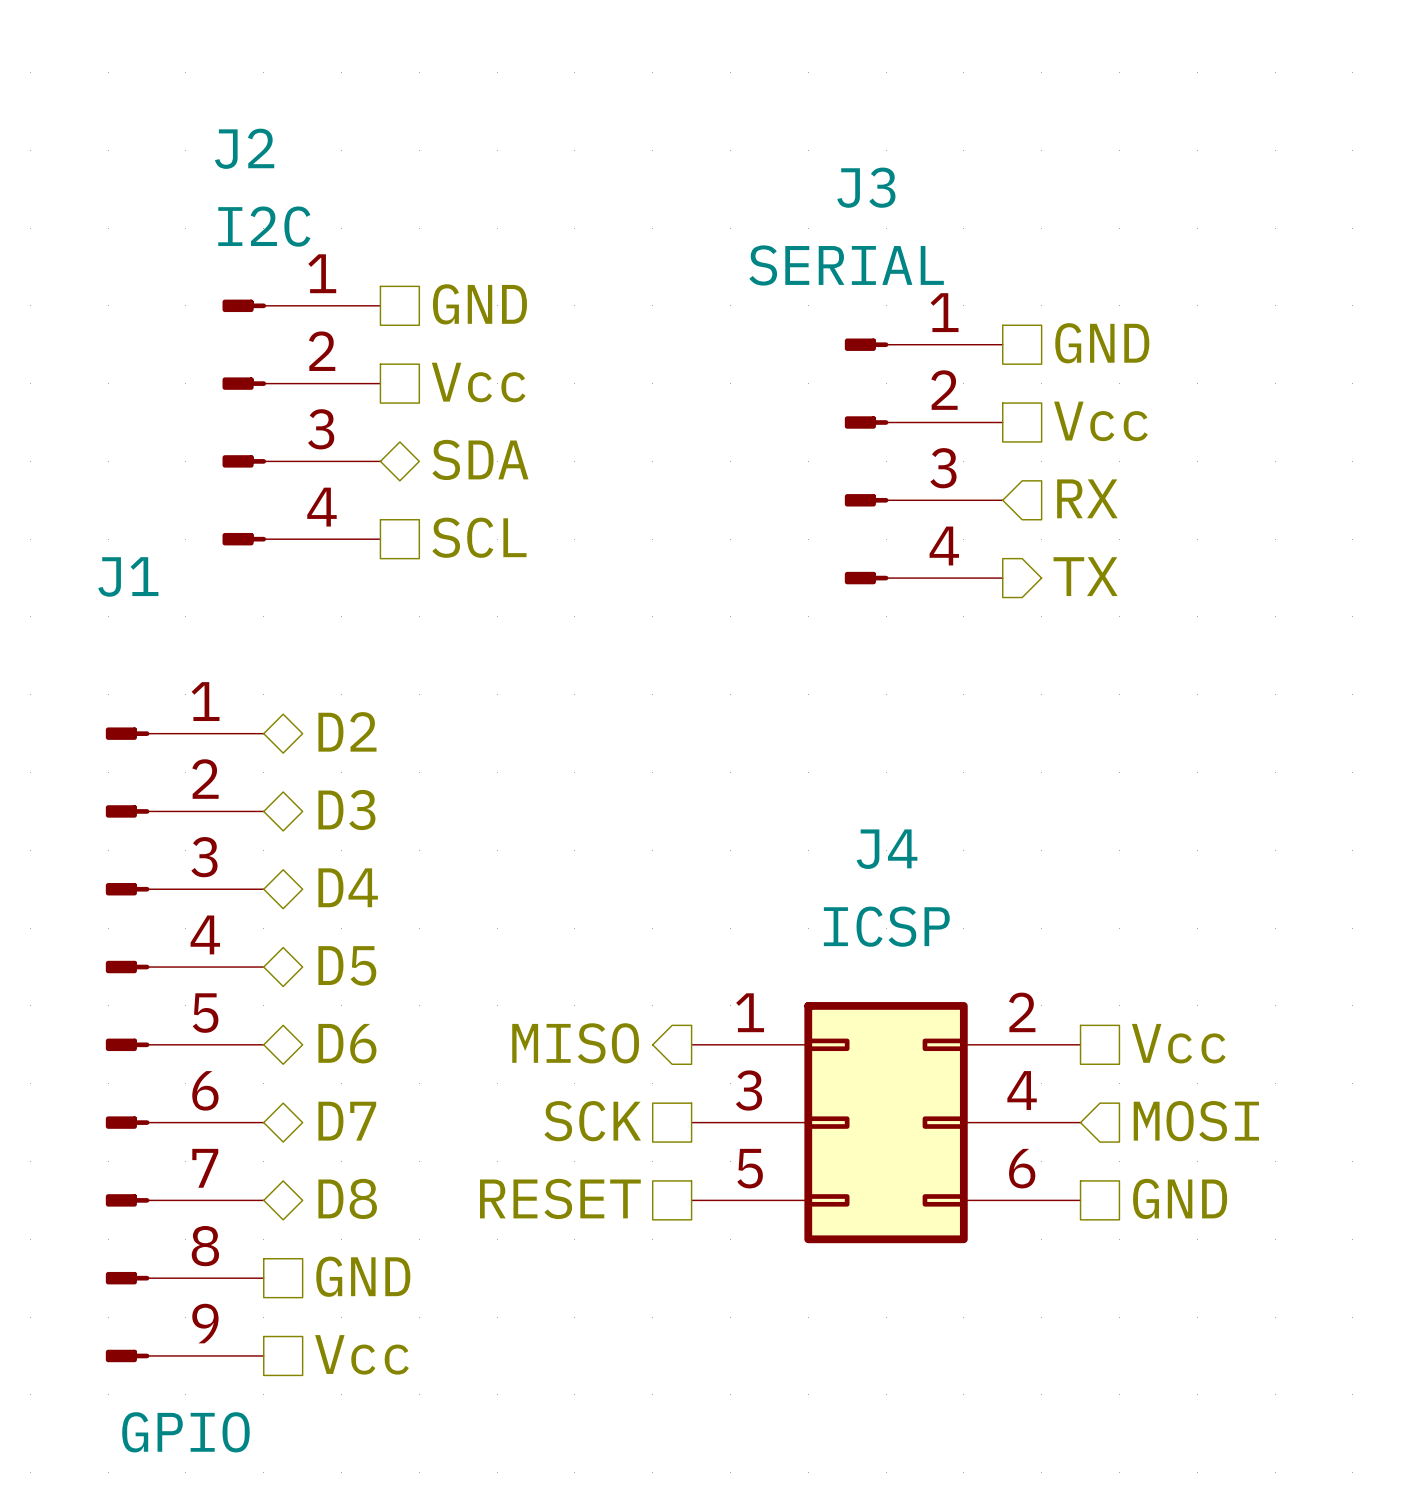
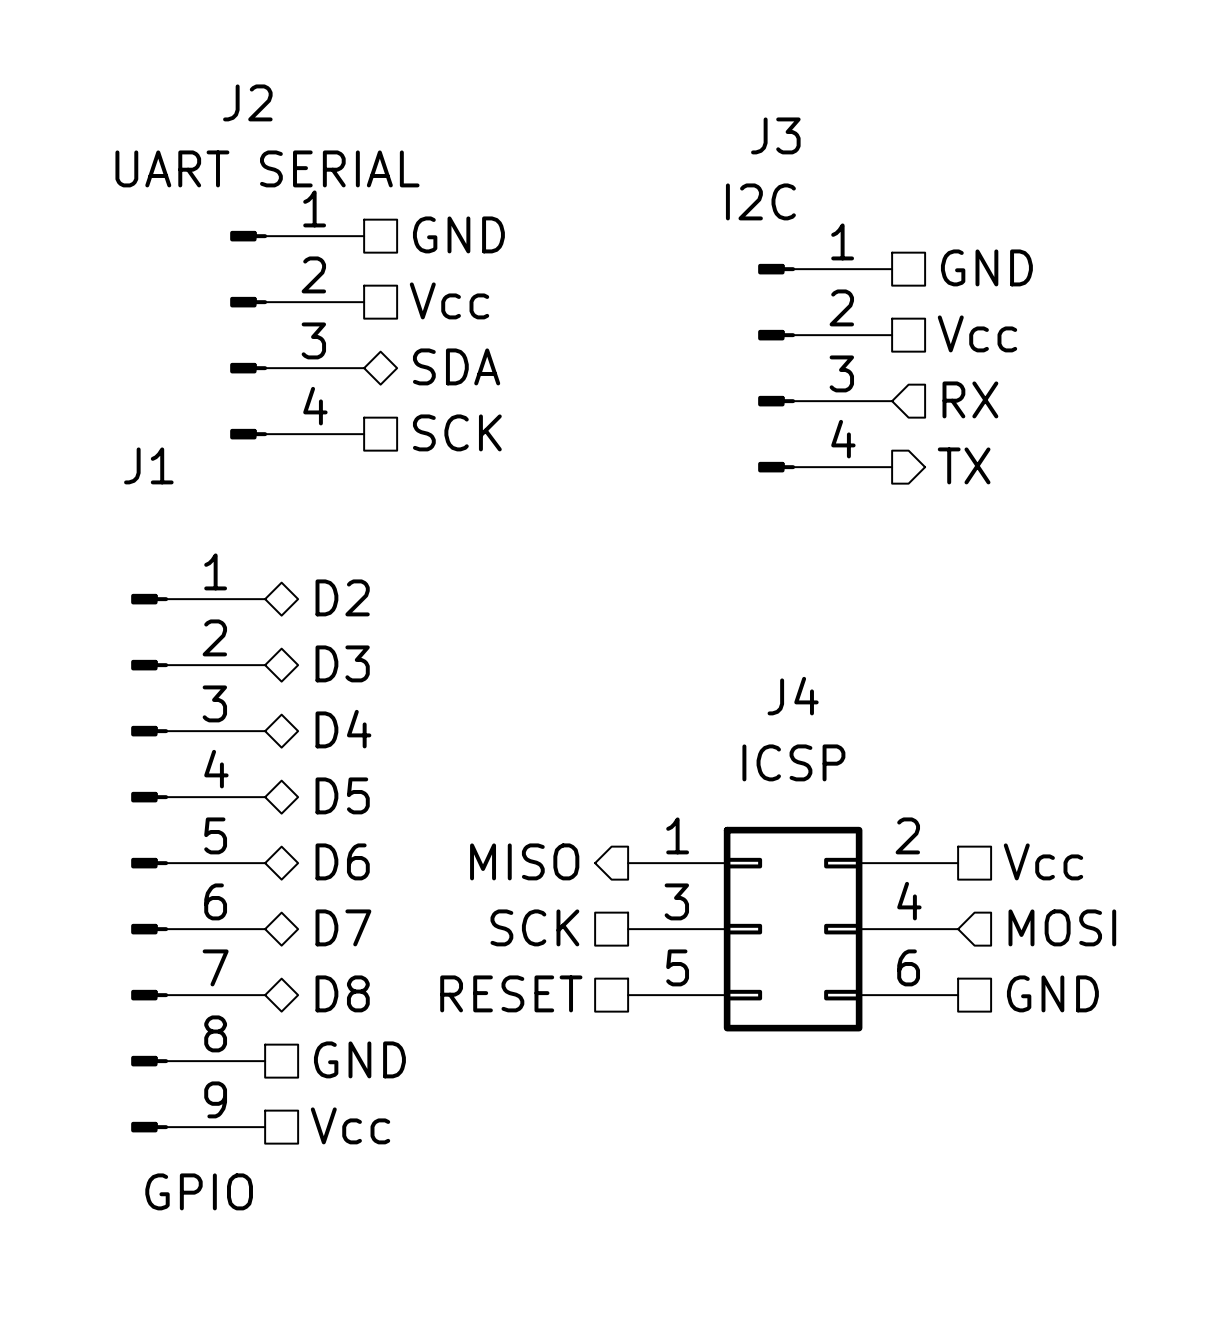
J2 text: I2C (264, 226) -> UART SERIAL (267, 168)
J3 text: SERIAL (846, 265) -> I2C (760, 201)
hierarchical label: SCL (479, 537) -> SCK (457, 432)

